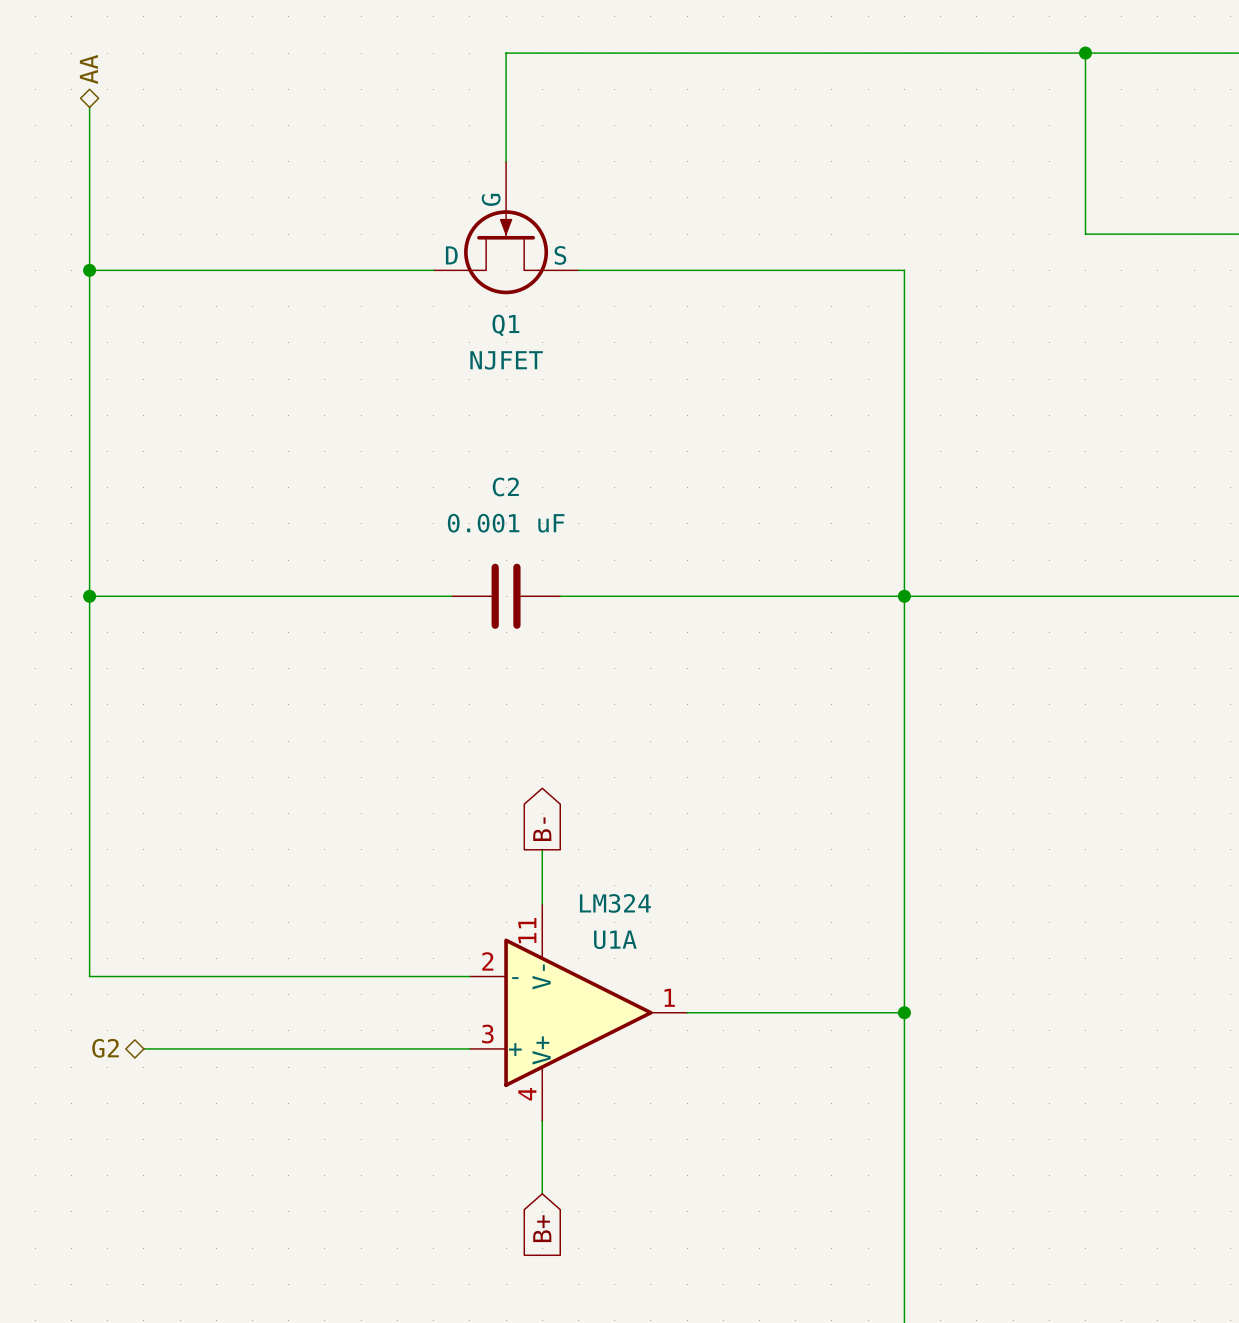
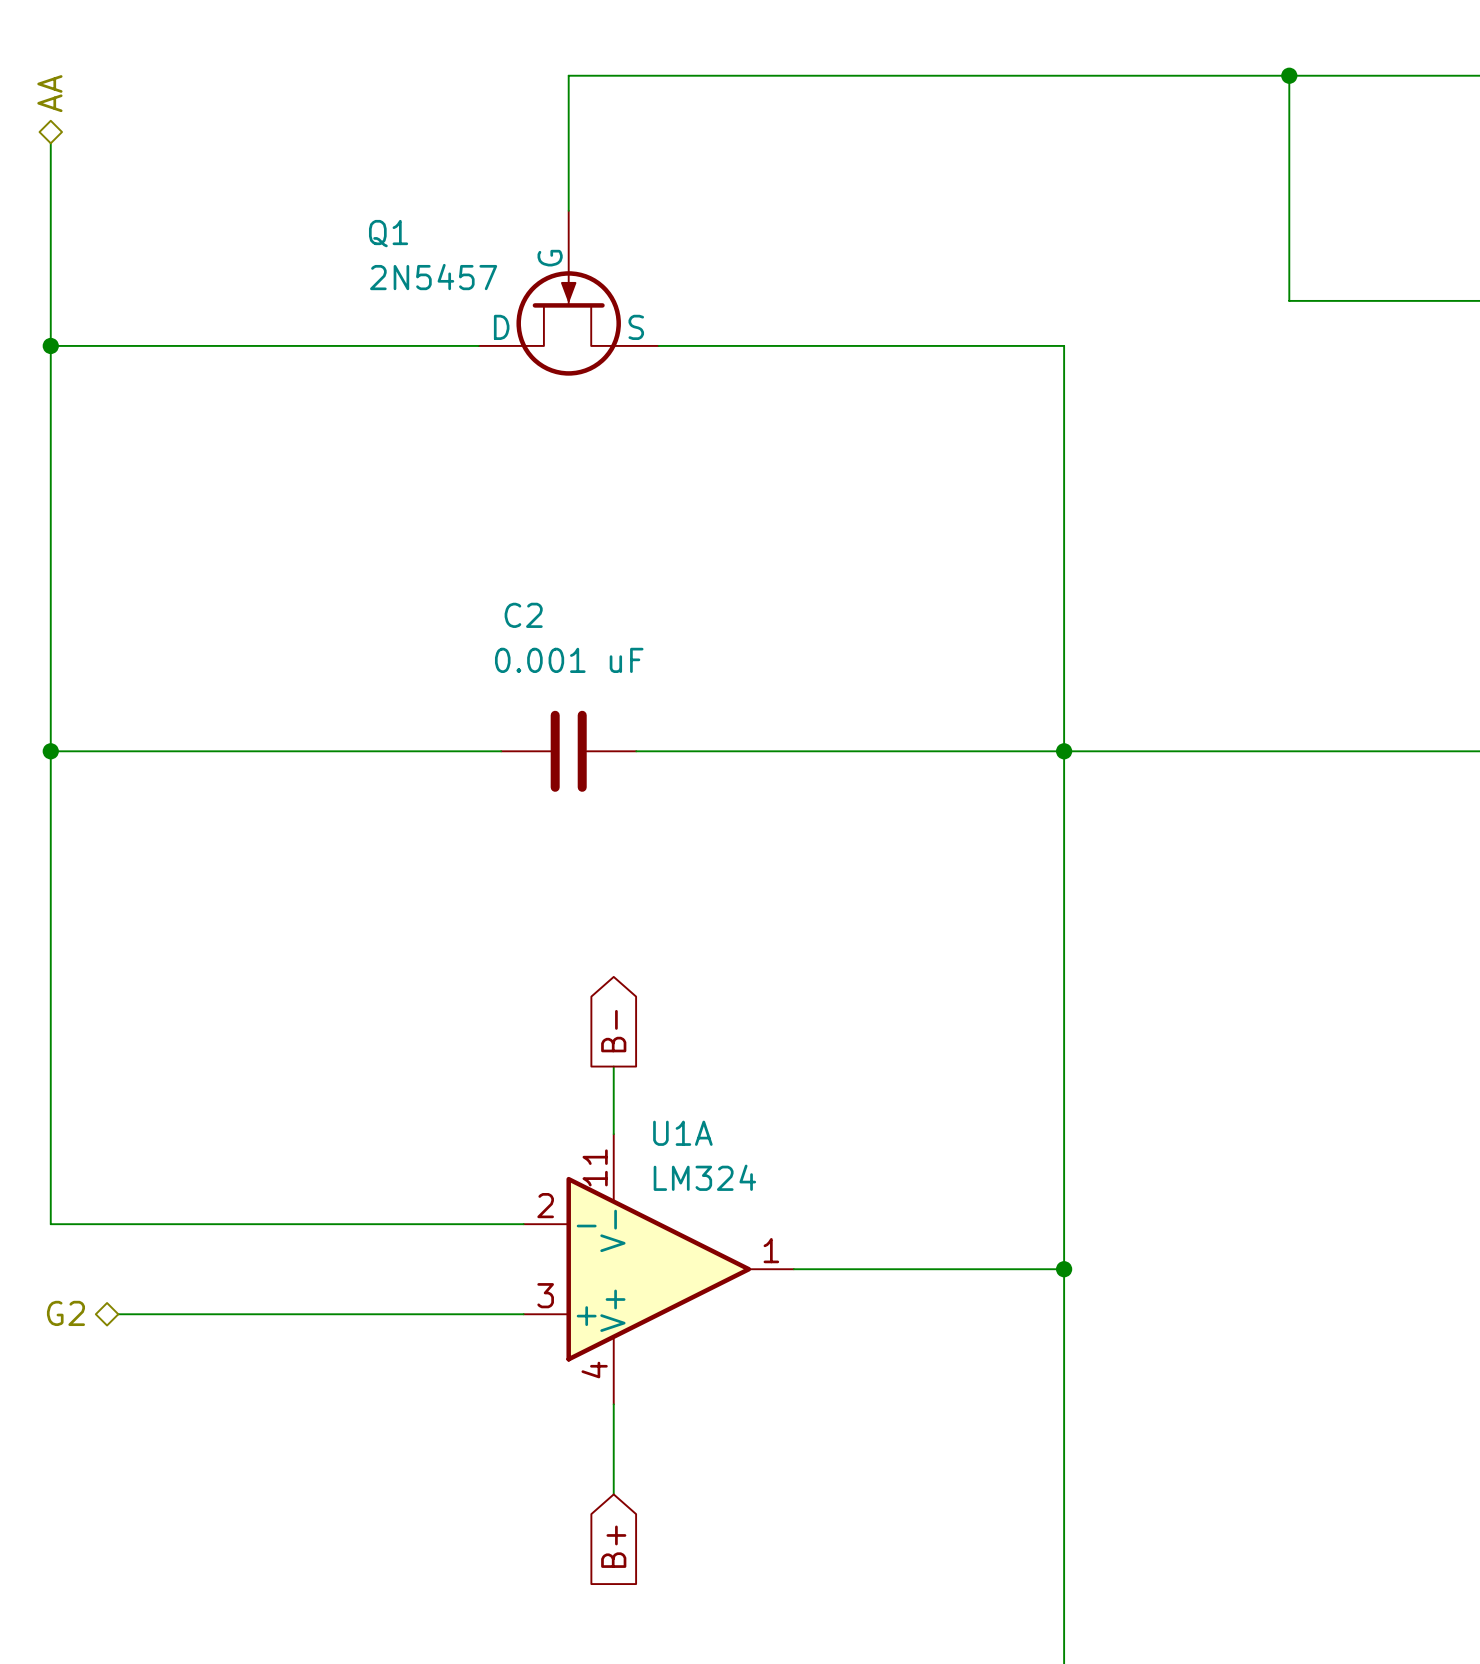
Q1 name position: Q1 (505, 325) -> Q1 (388, 233)
Q1 value: NJFET (506, 360) -> 2N5457 (433, 277)
C2 name position: C2 (505, 486) -> C2 (523, 615)
U1A value position: LM324 (615, 903) -> LM324 (704, 1177)
U1A name position: U1A (615, 939) -> U1A (682, 1133)

